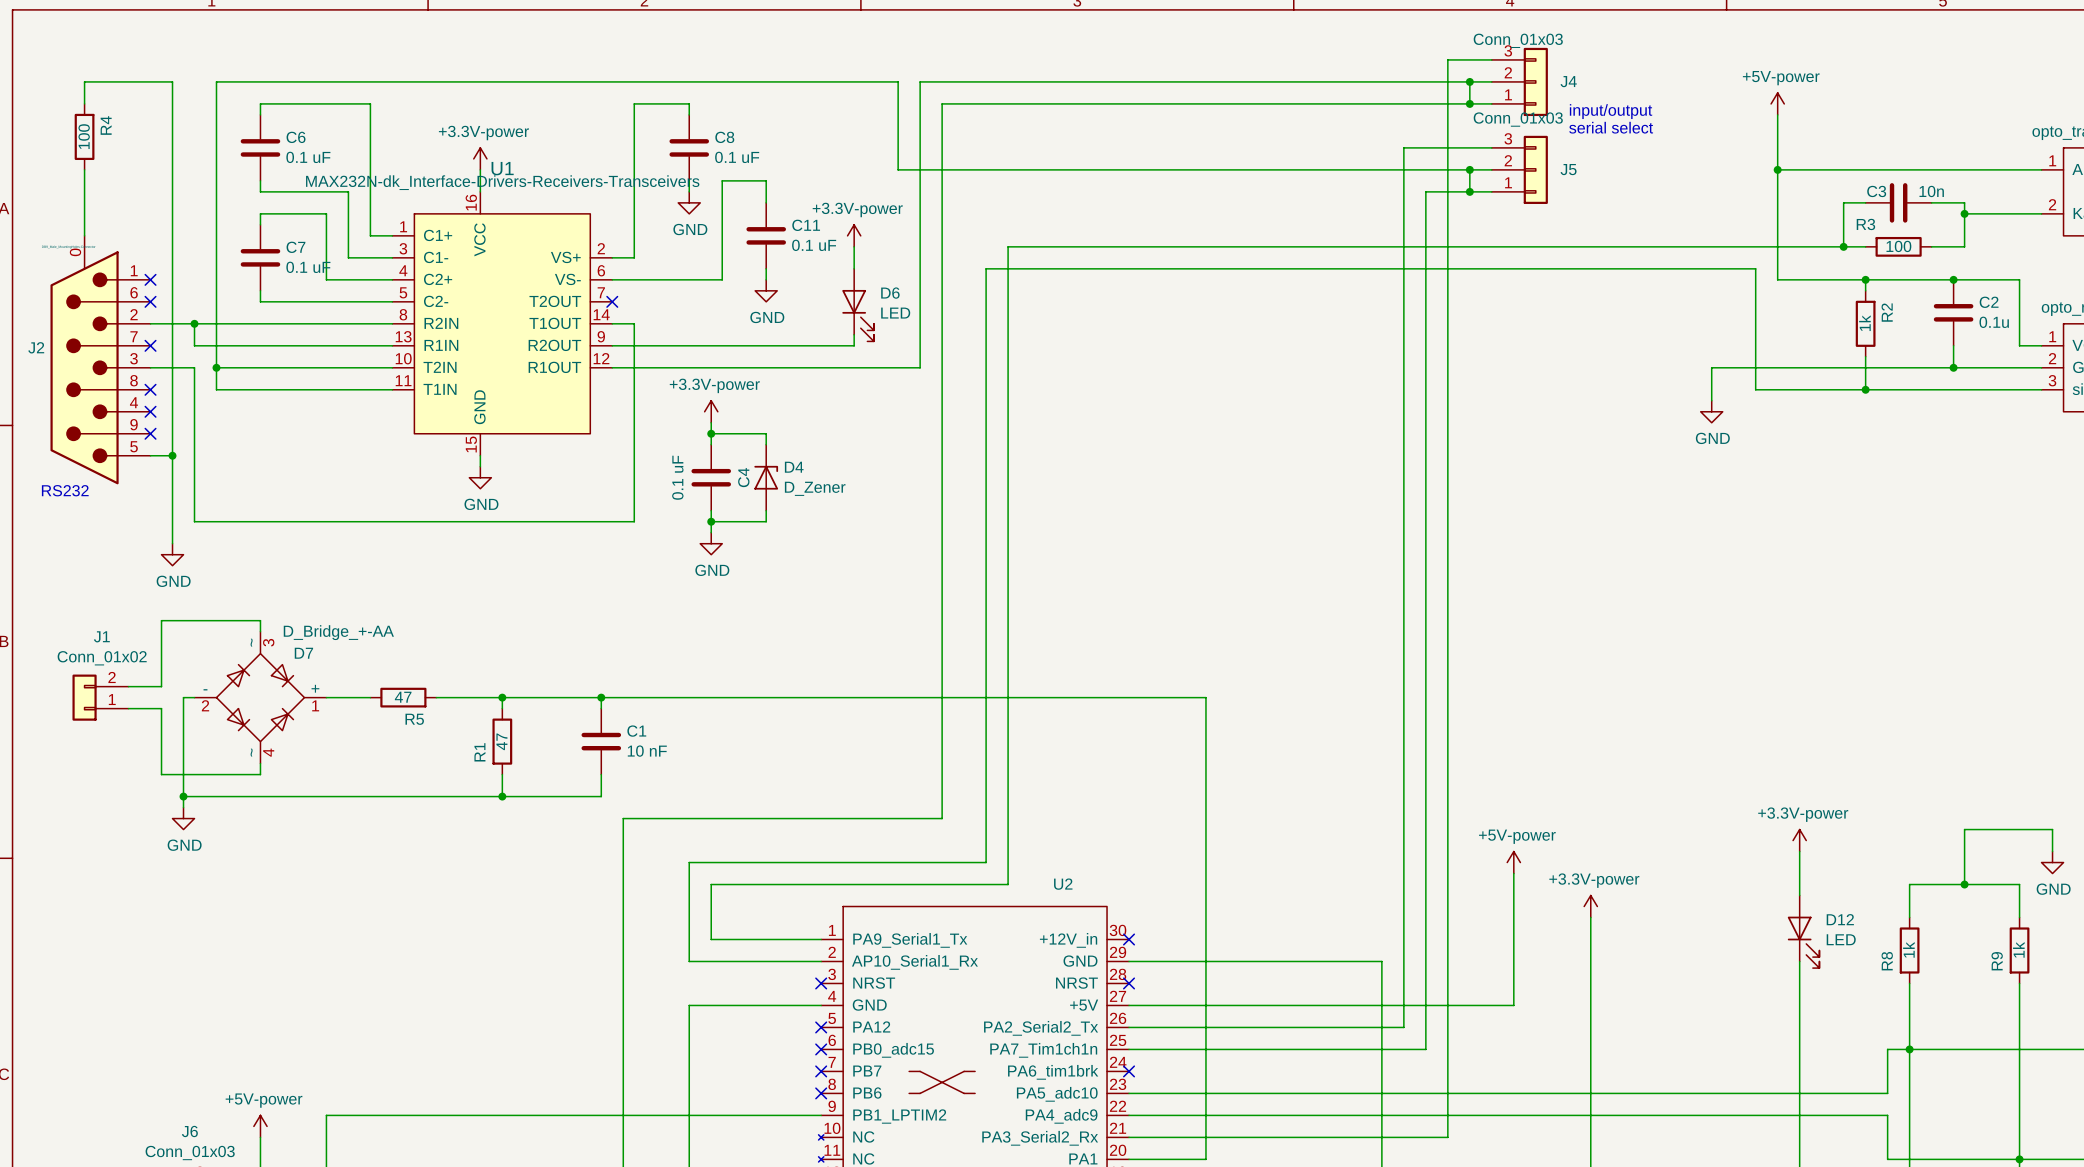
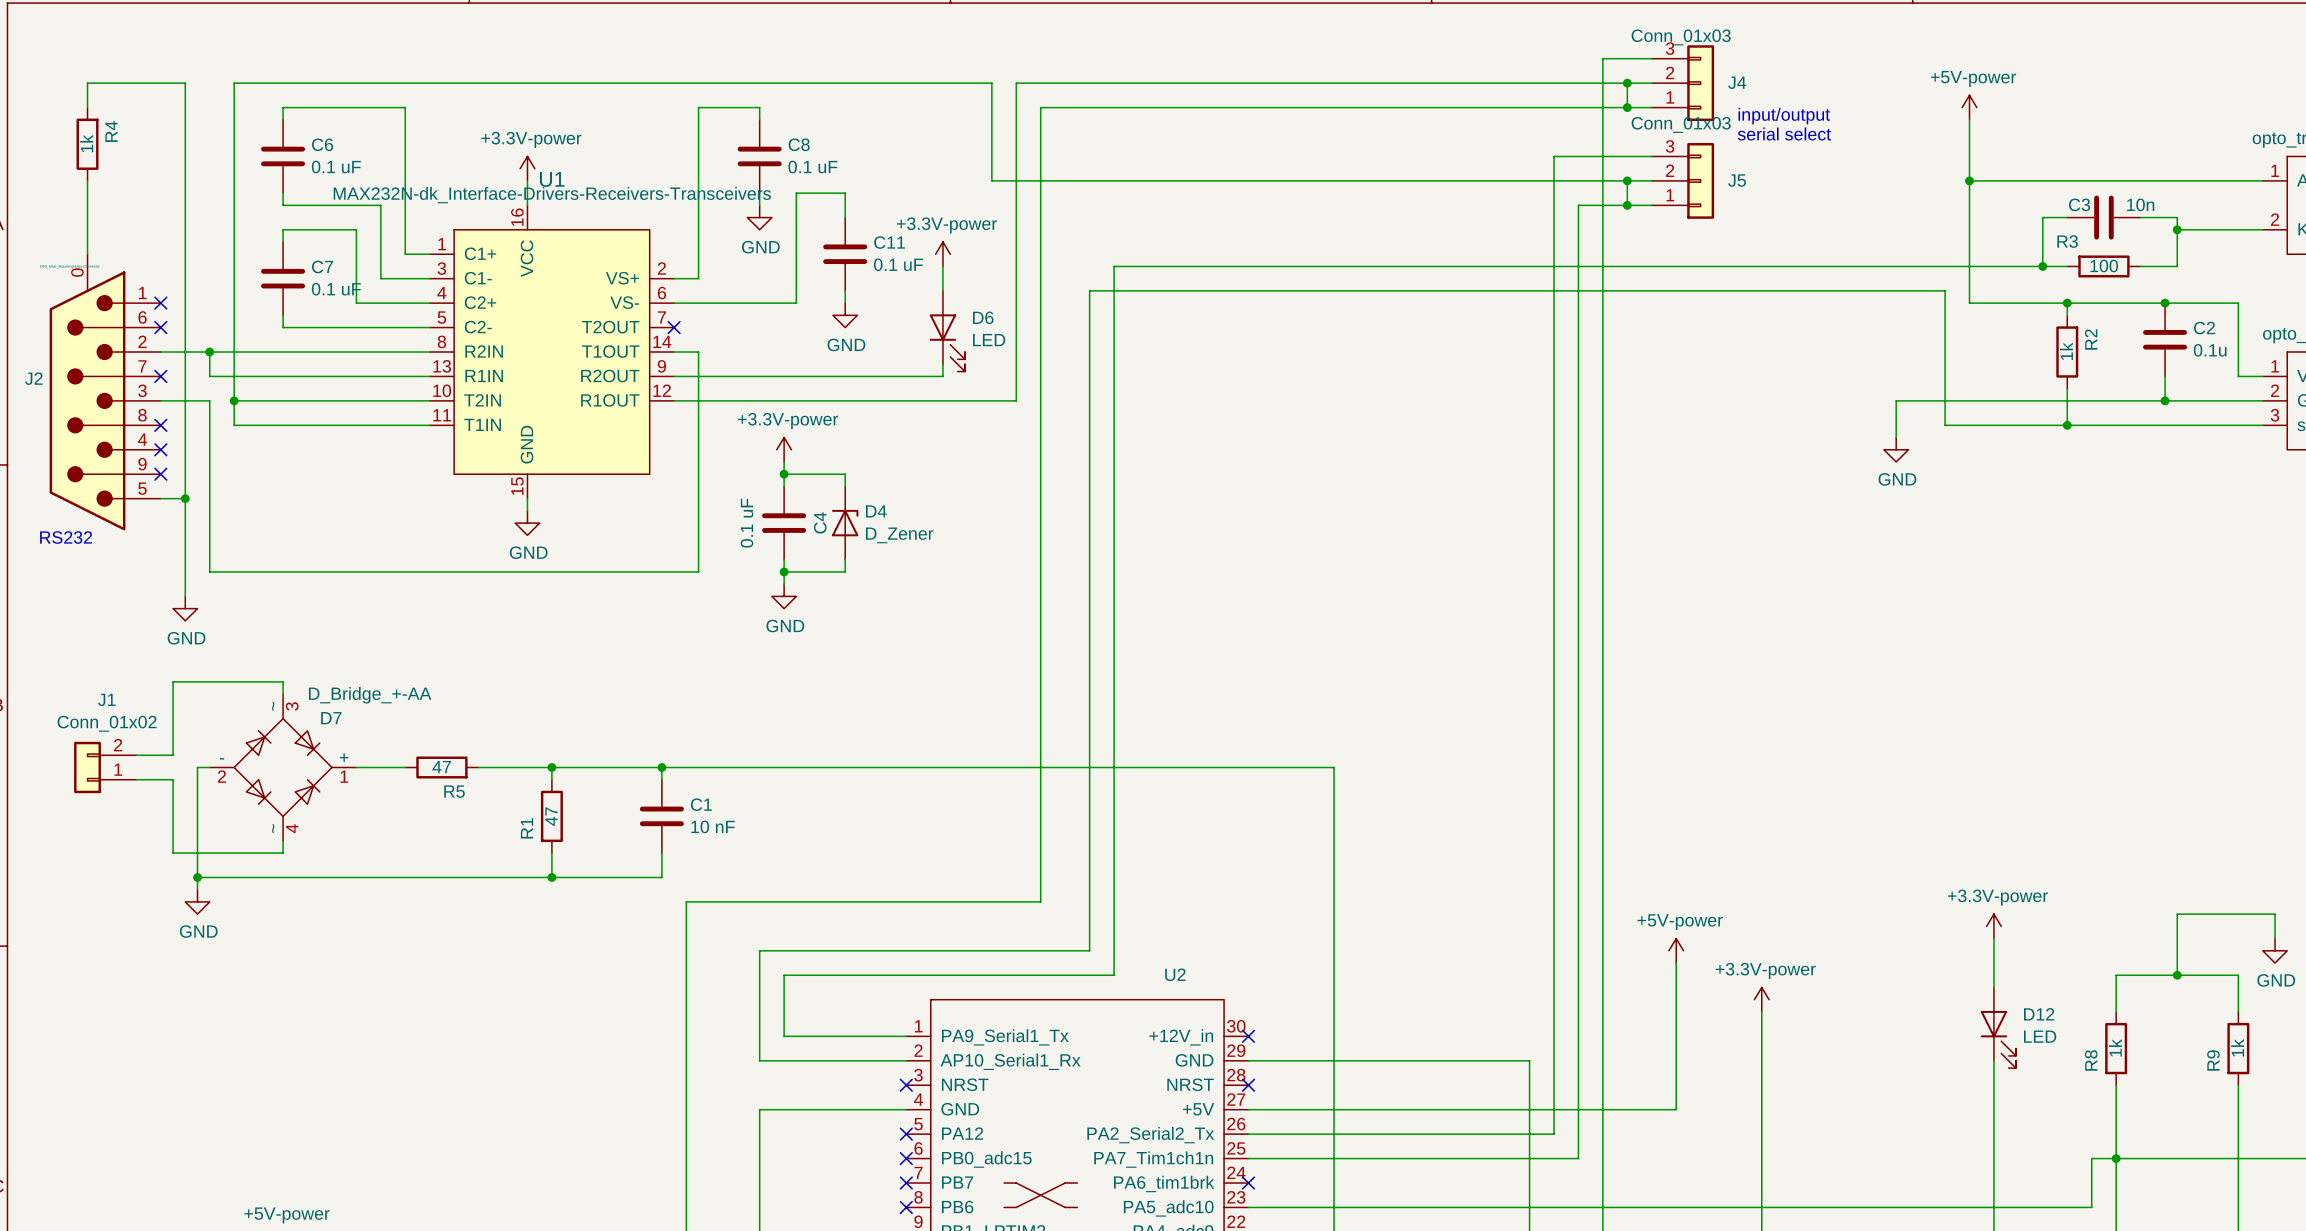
R4 value: 100 (84, 136) -> 1k (86, 143)

